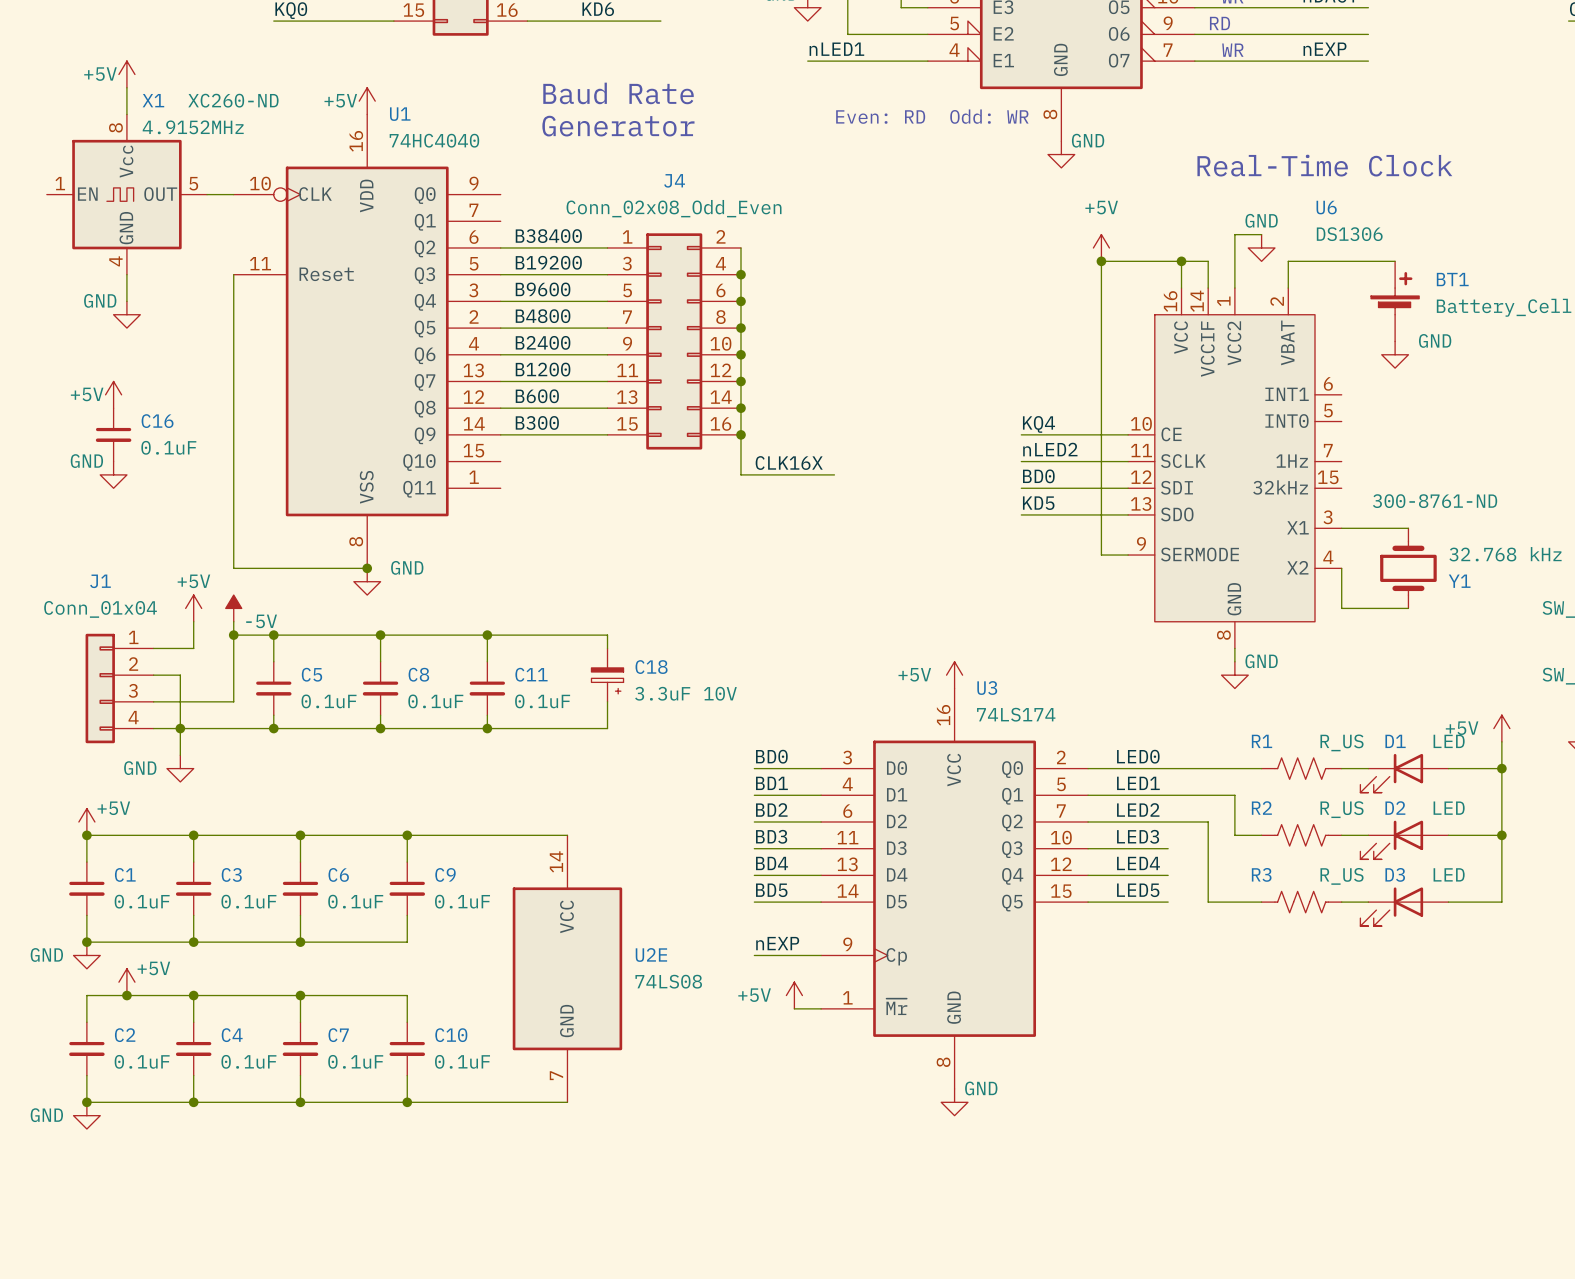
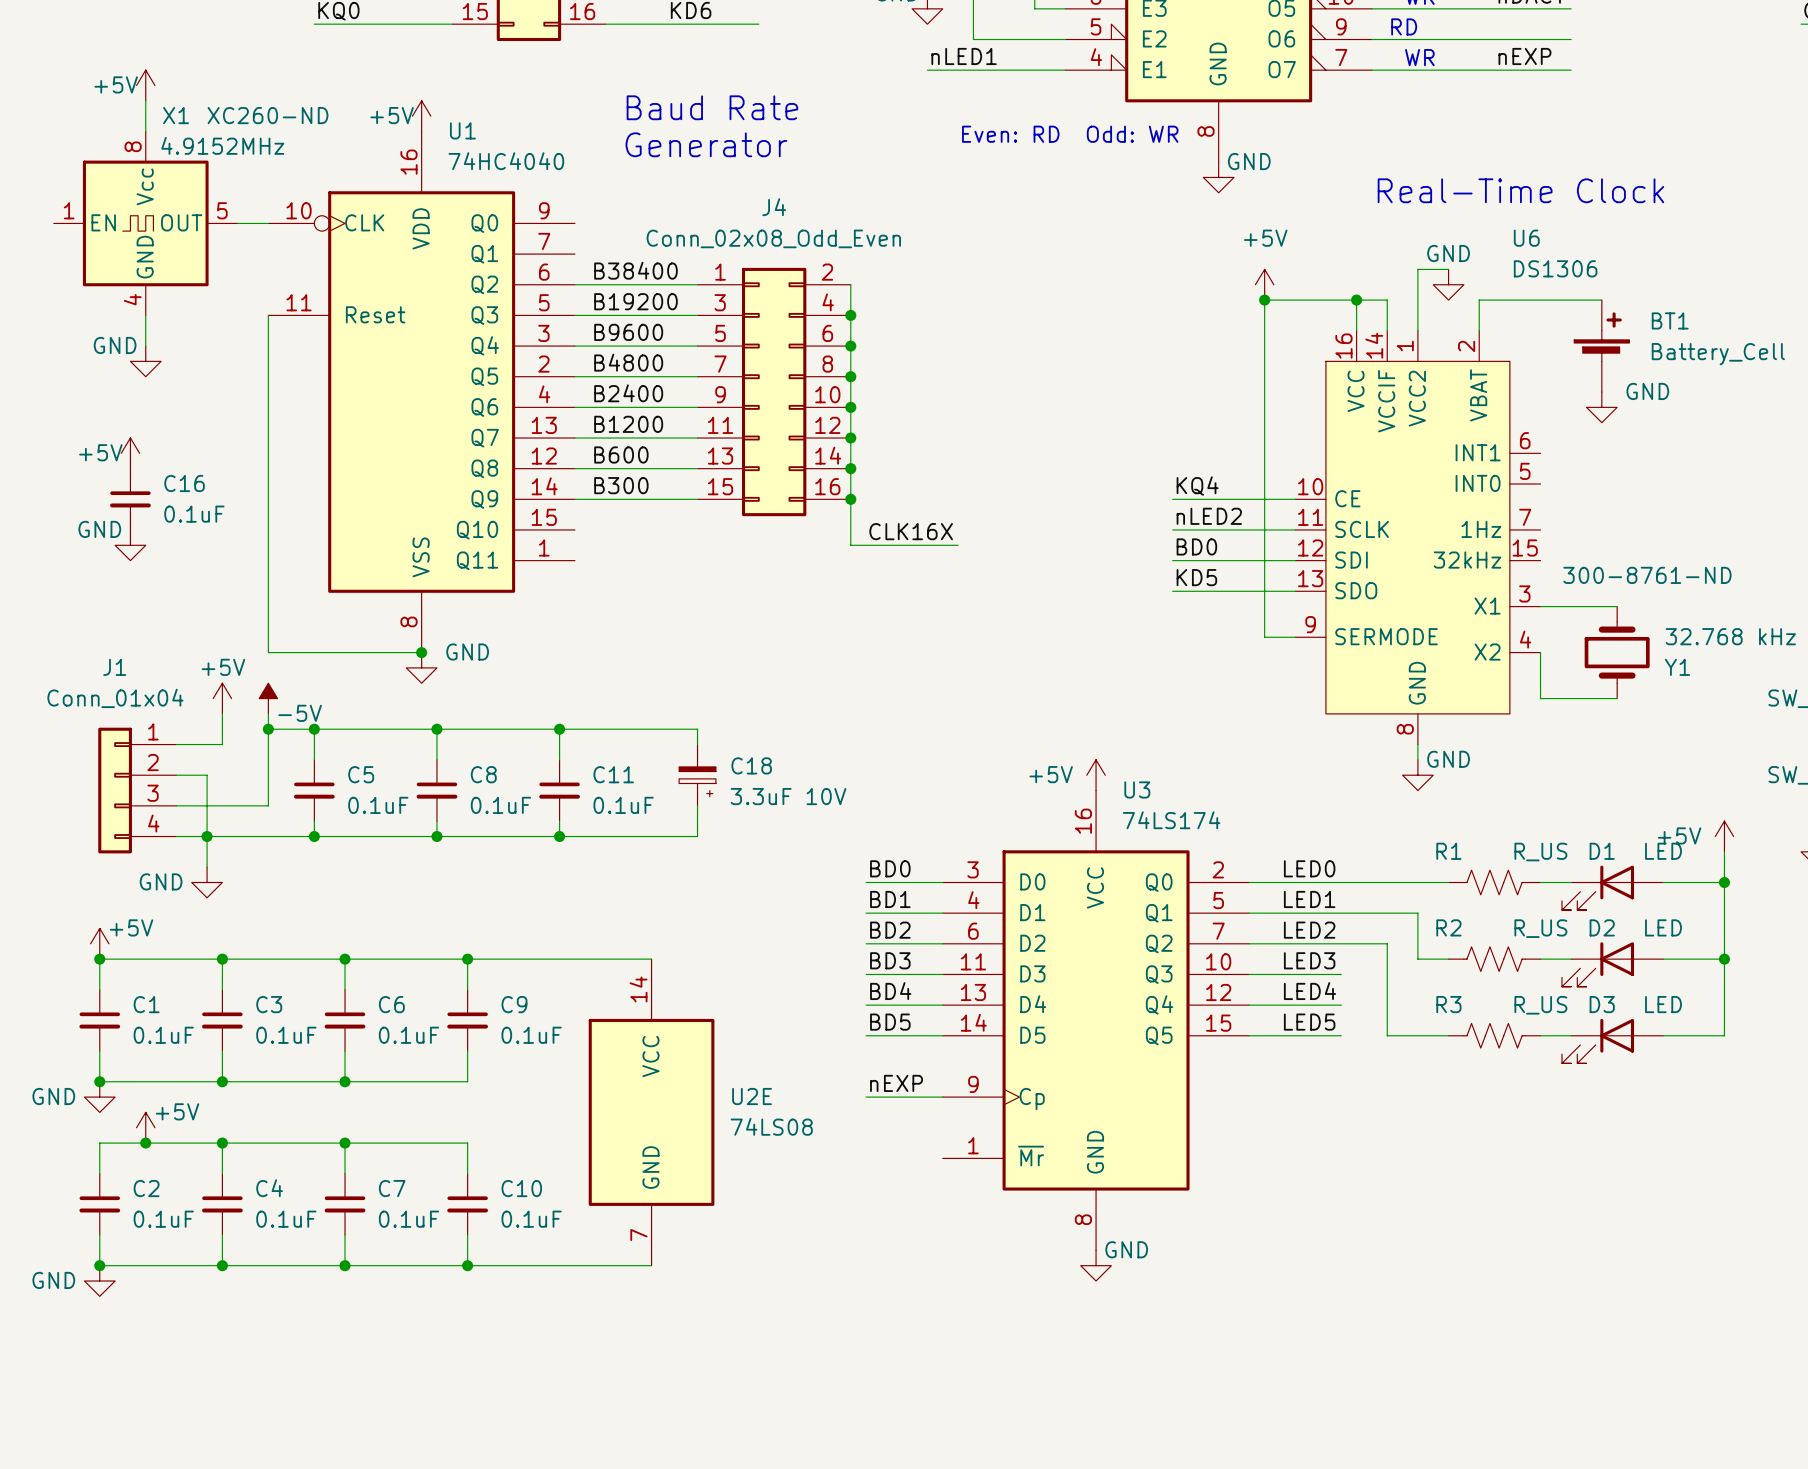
power symbol: +5V (794, 995) -> none
wire: (794, 1008) (821, 1008) -> none

